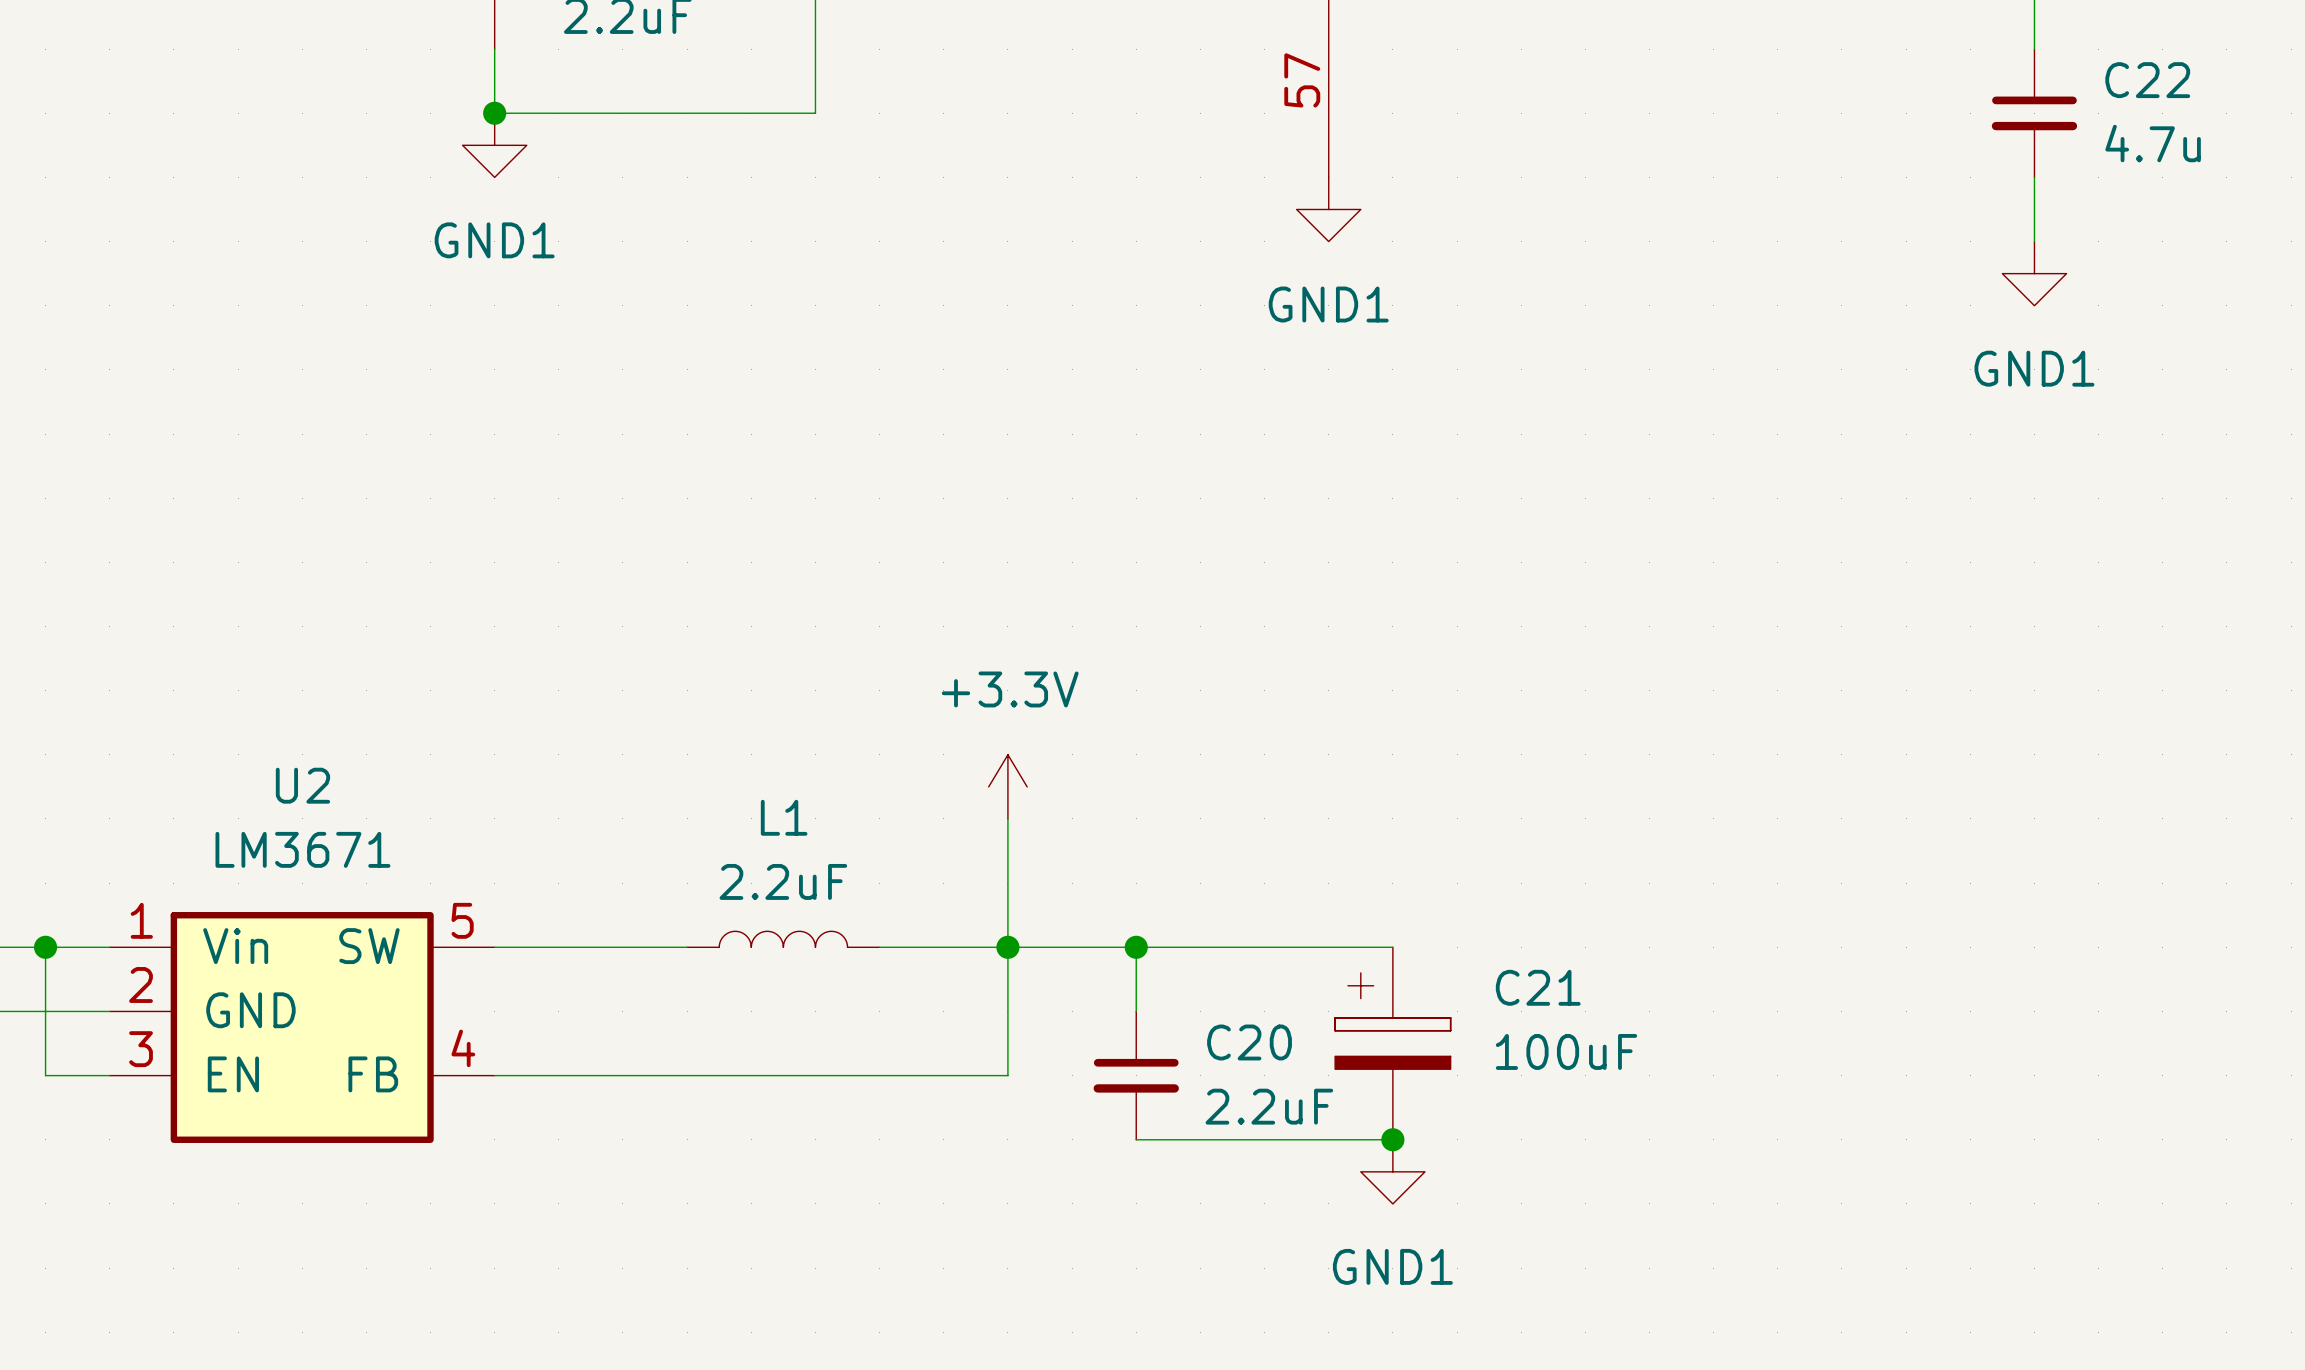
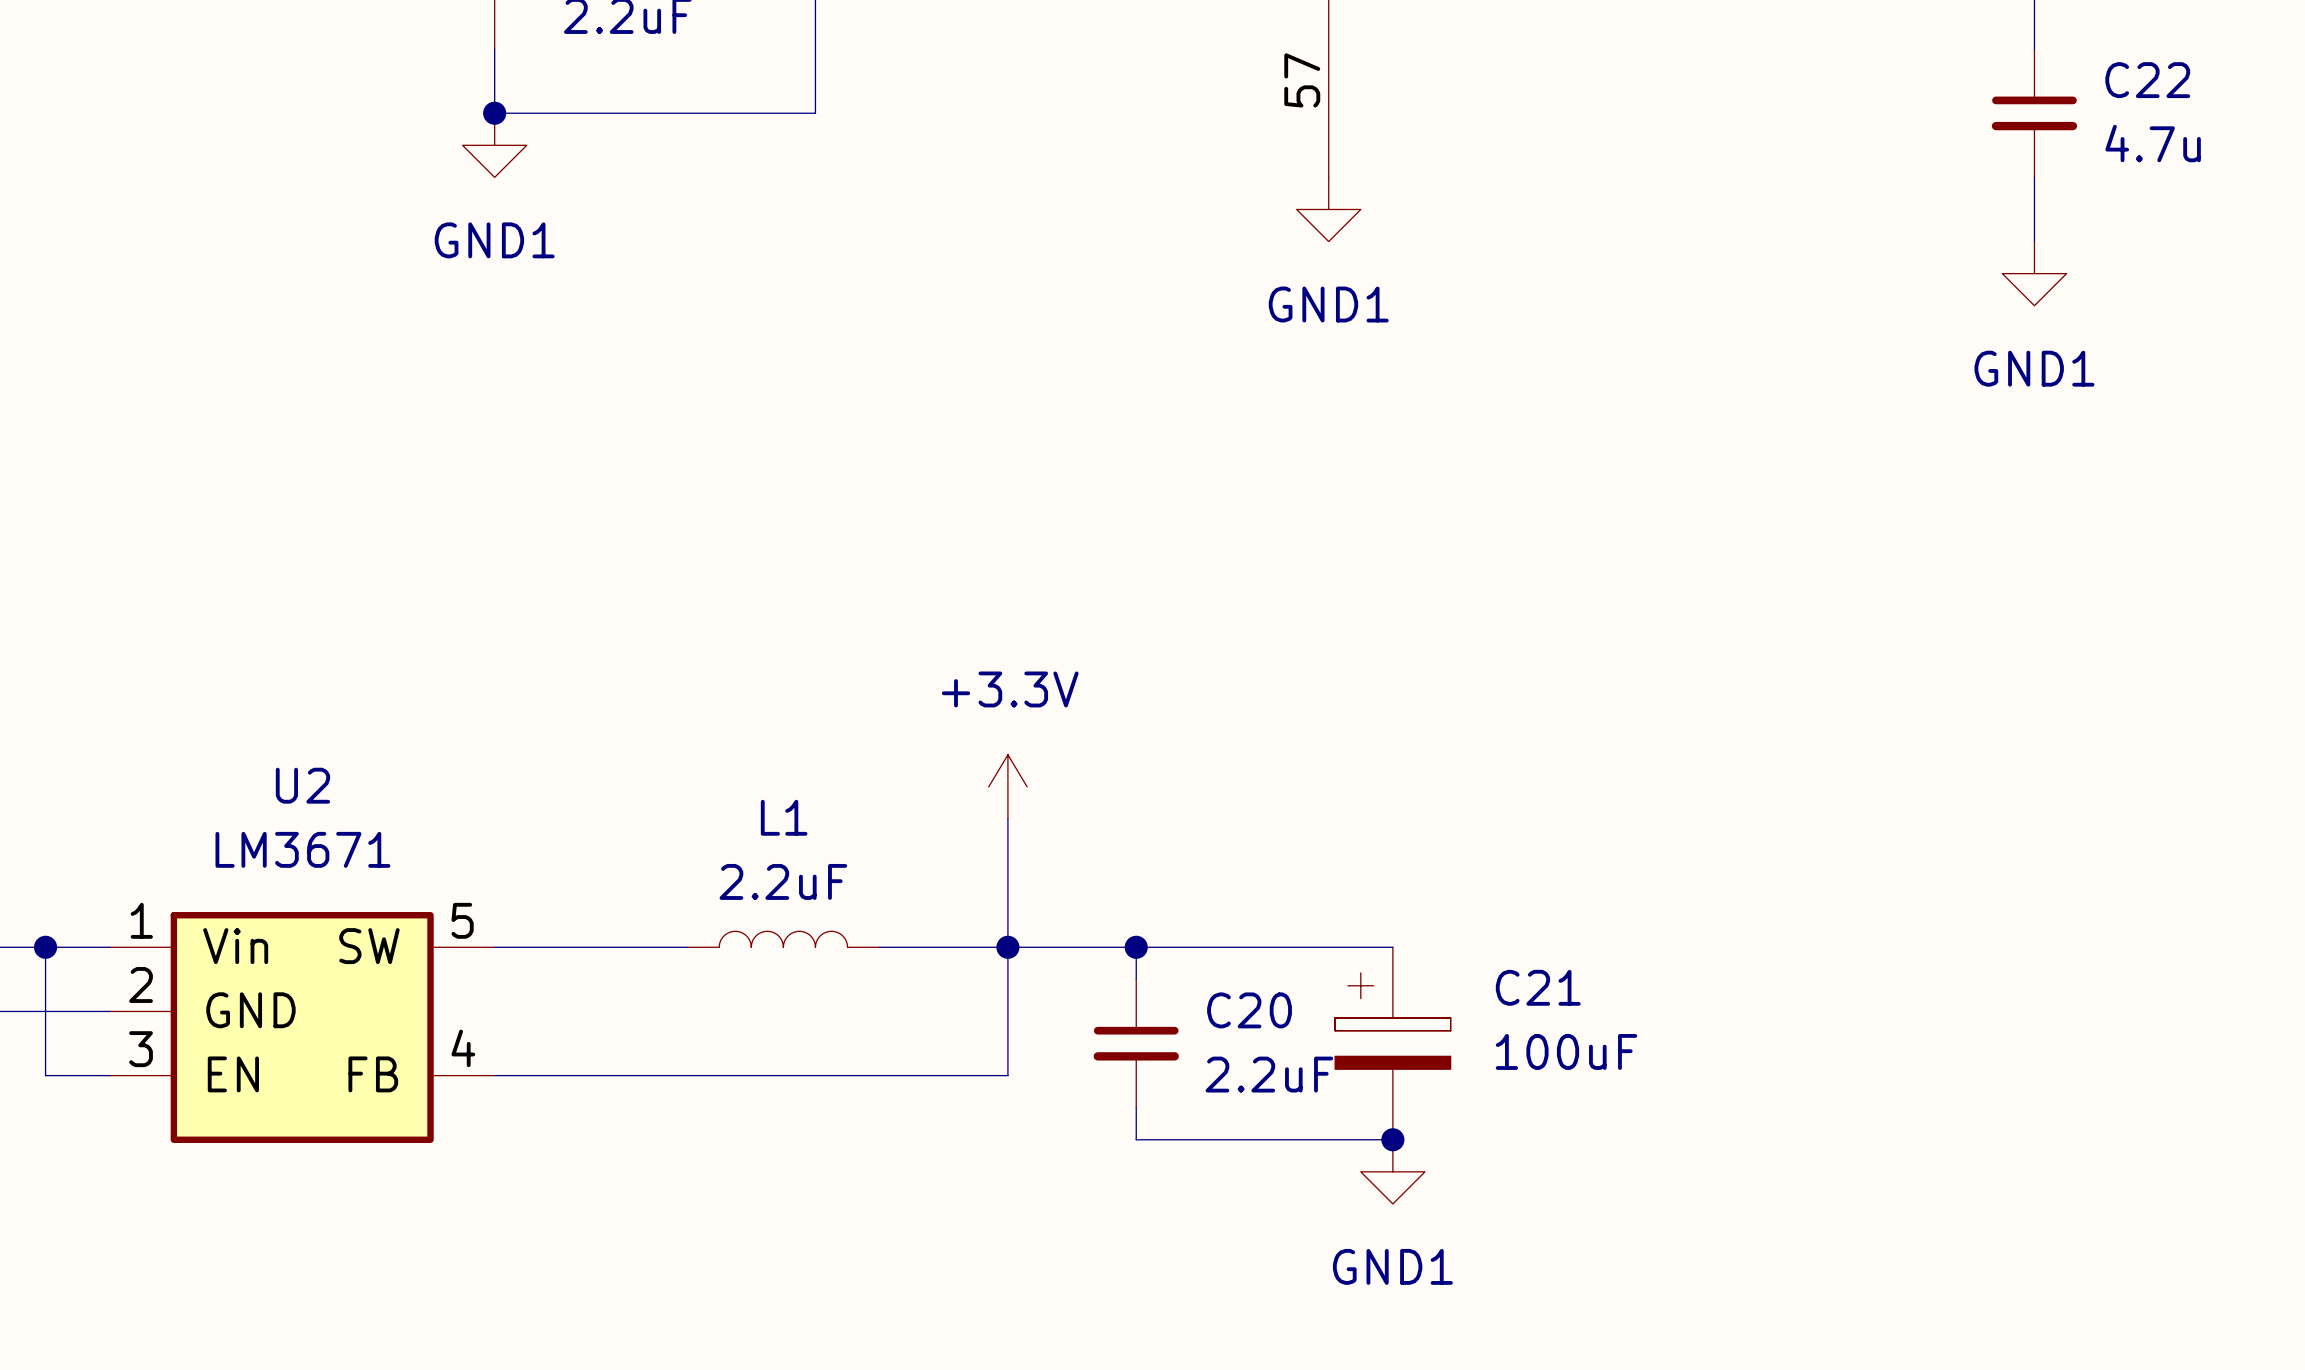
C20 position: (1136, 1075) -> (1136, 1043)

